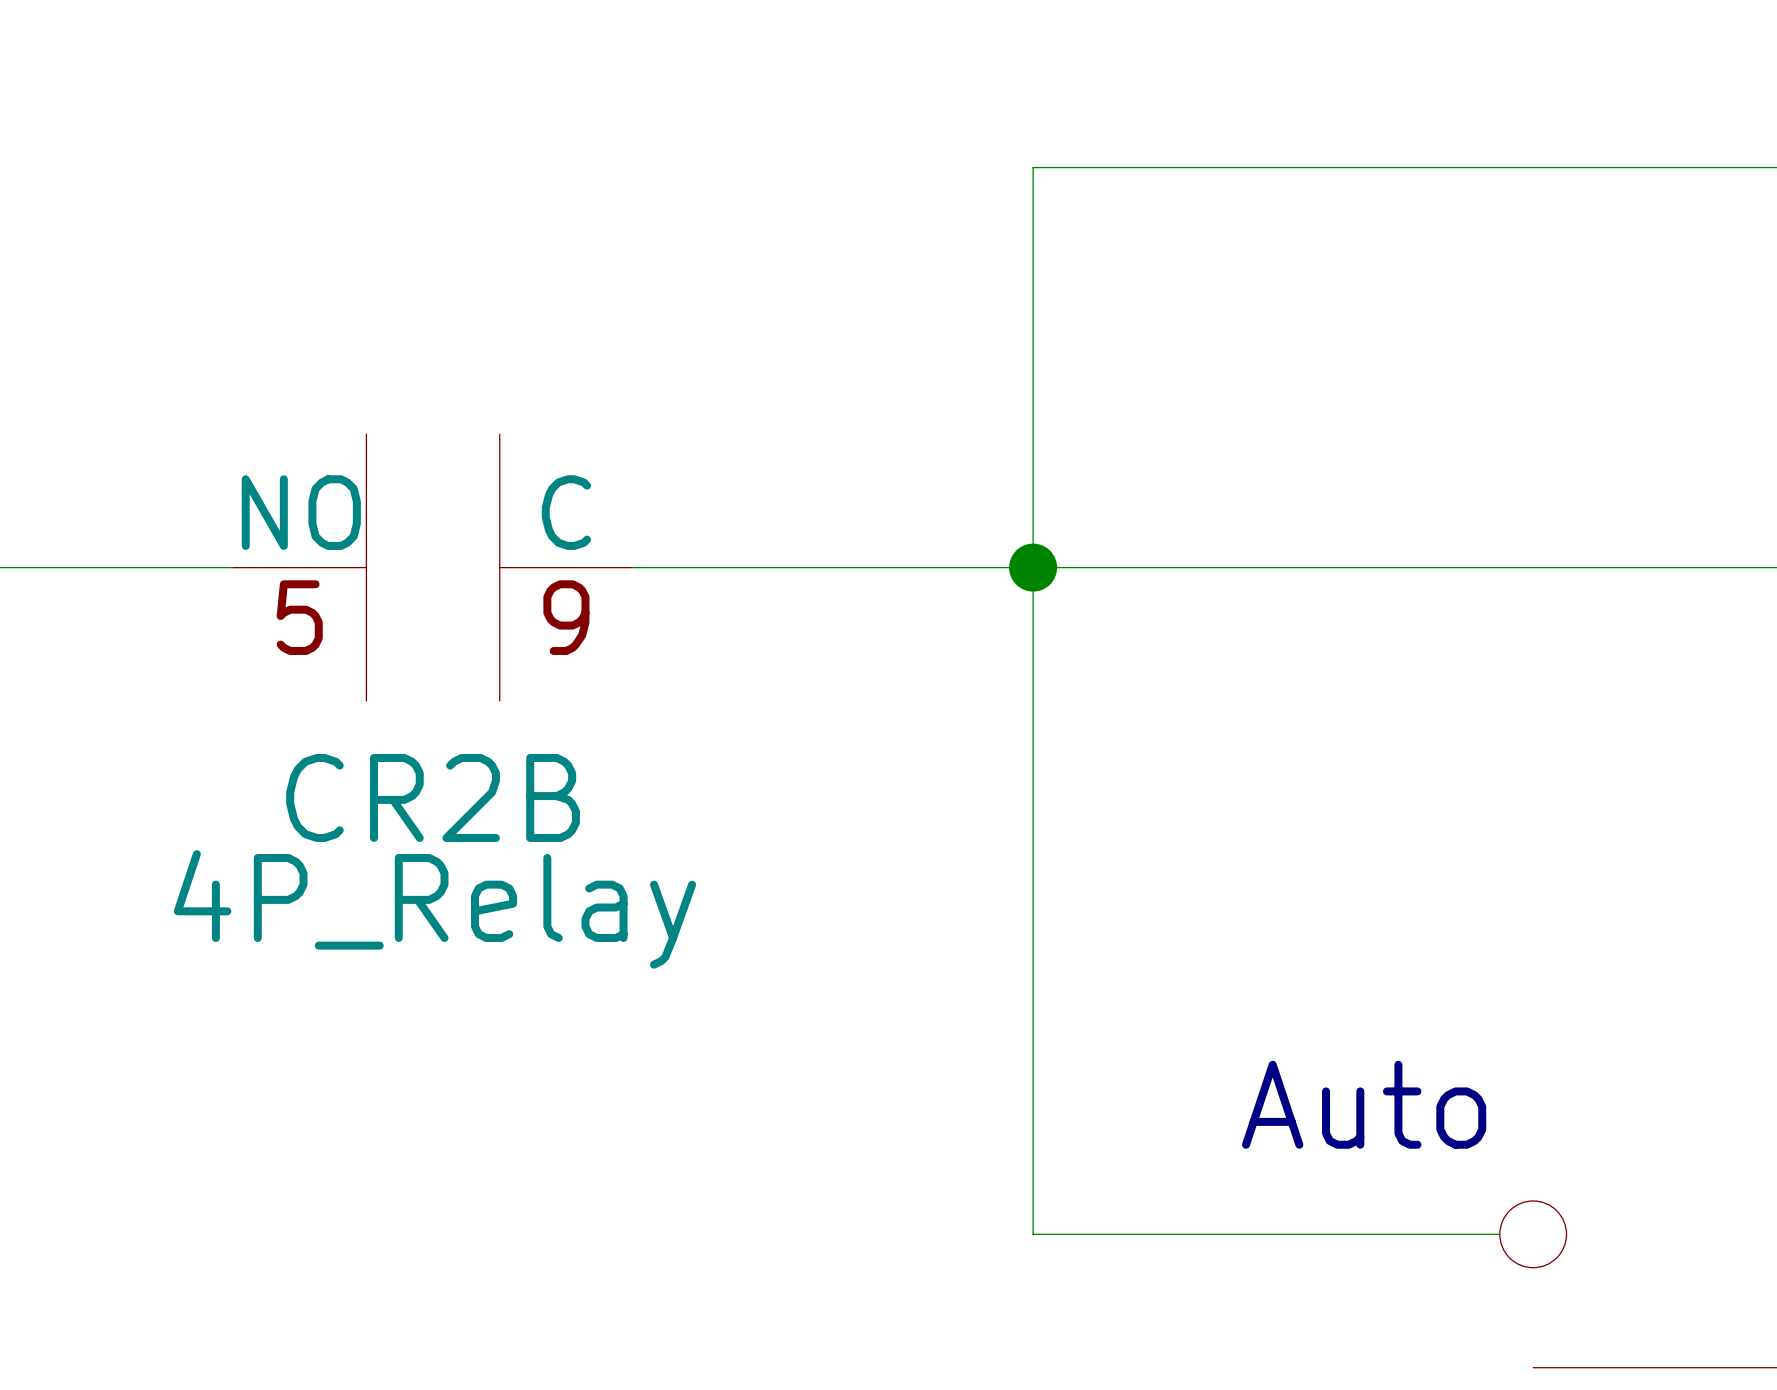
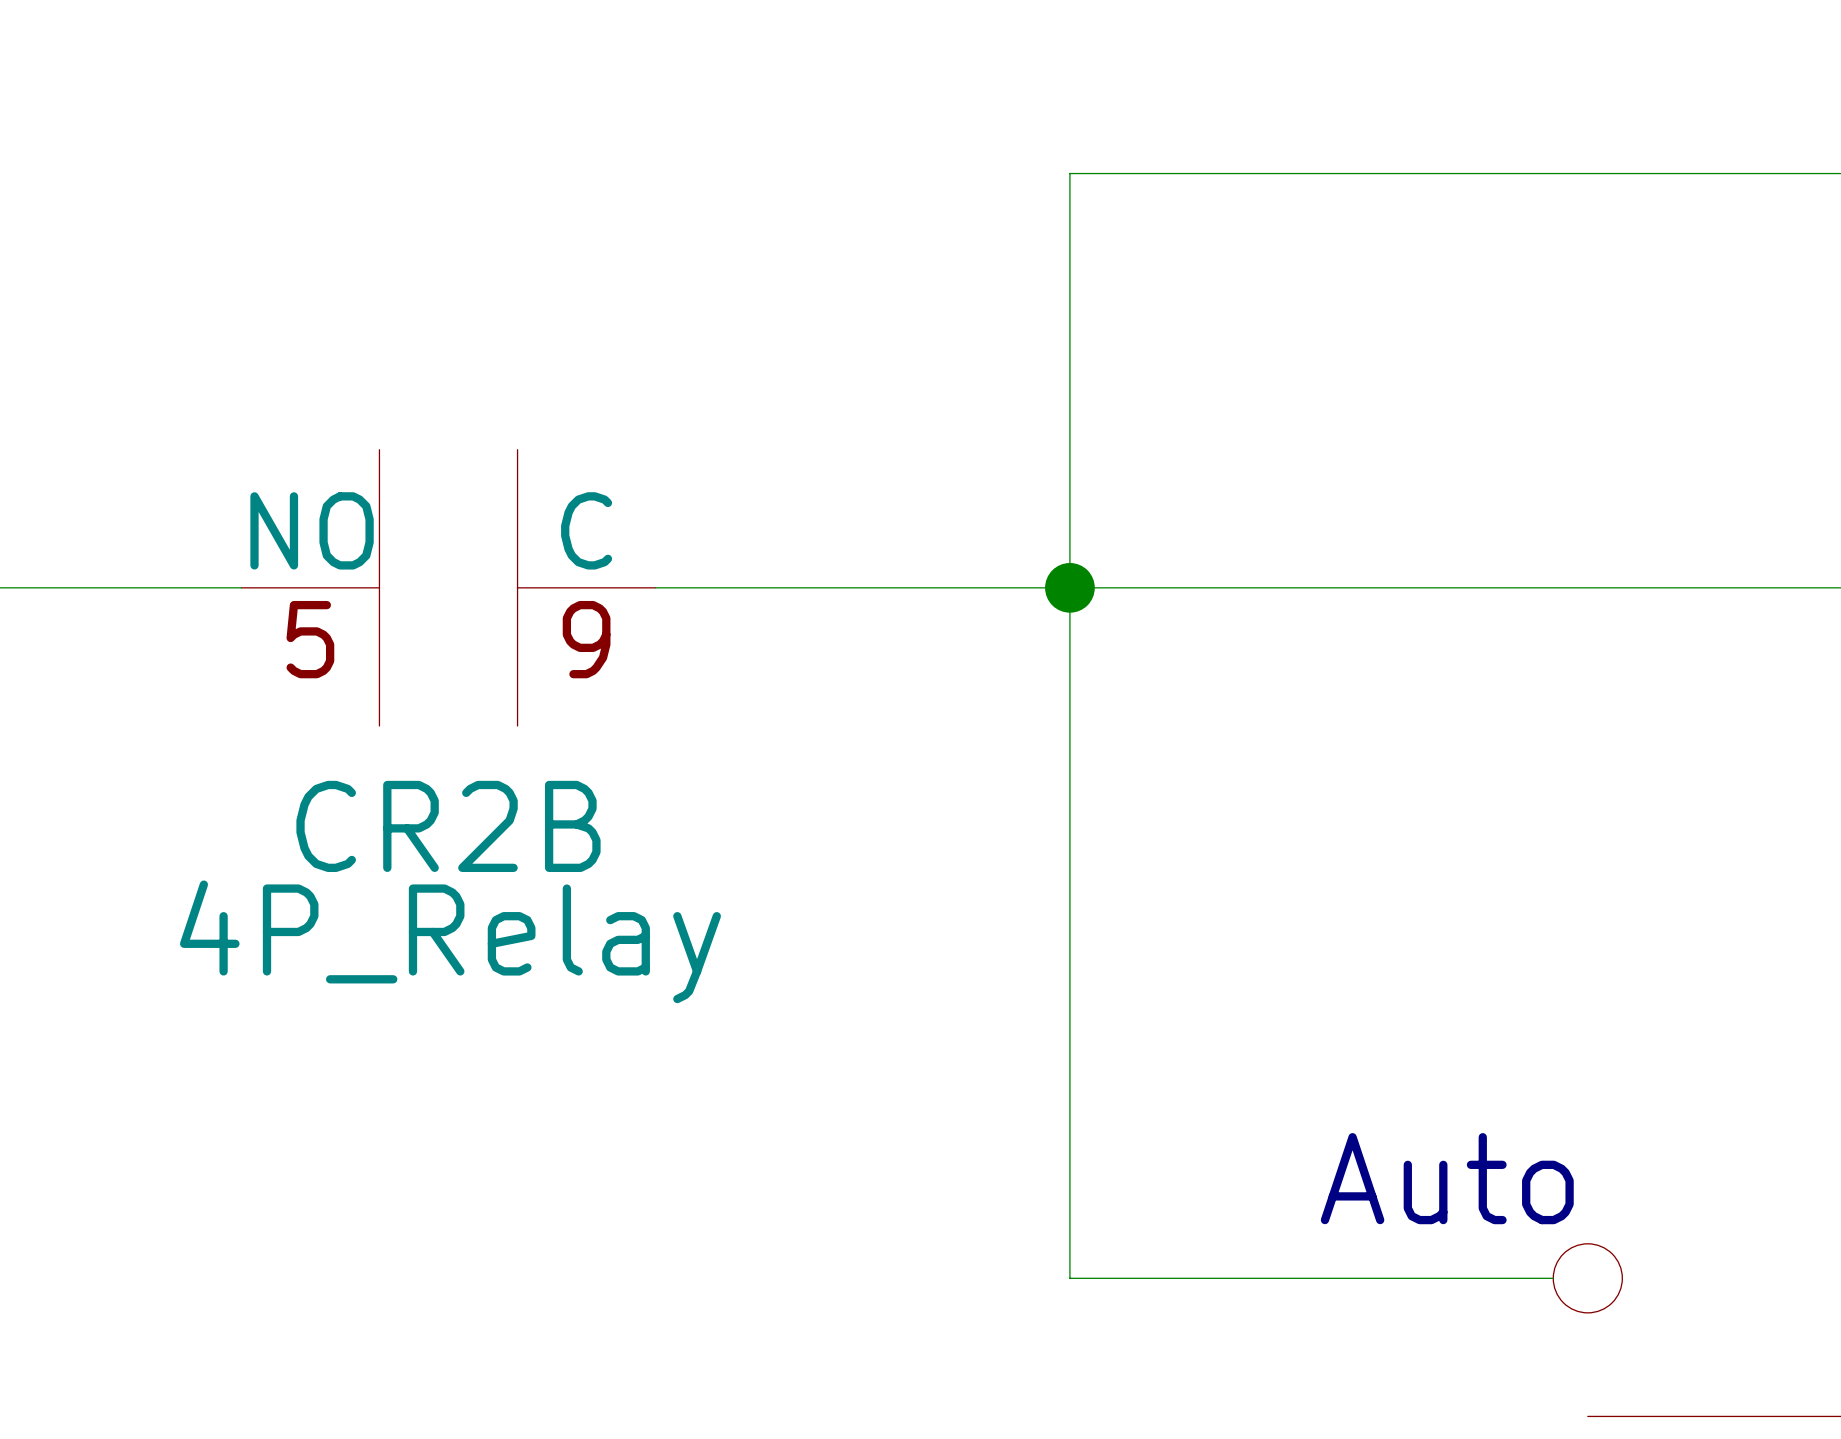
text position: Auto (1364, 1104) -> Auto (1447, 1178)

